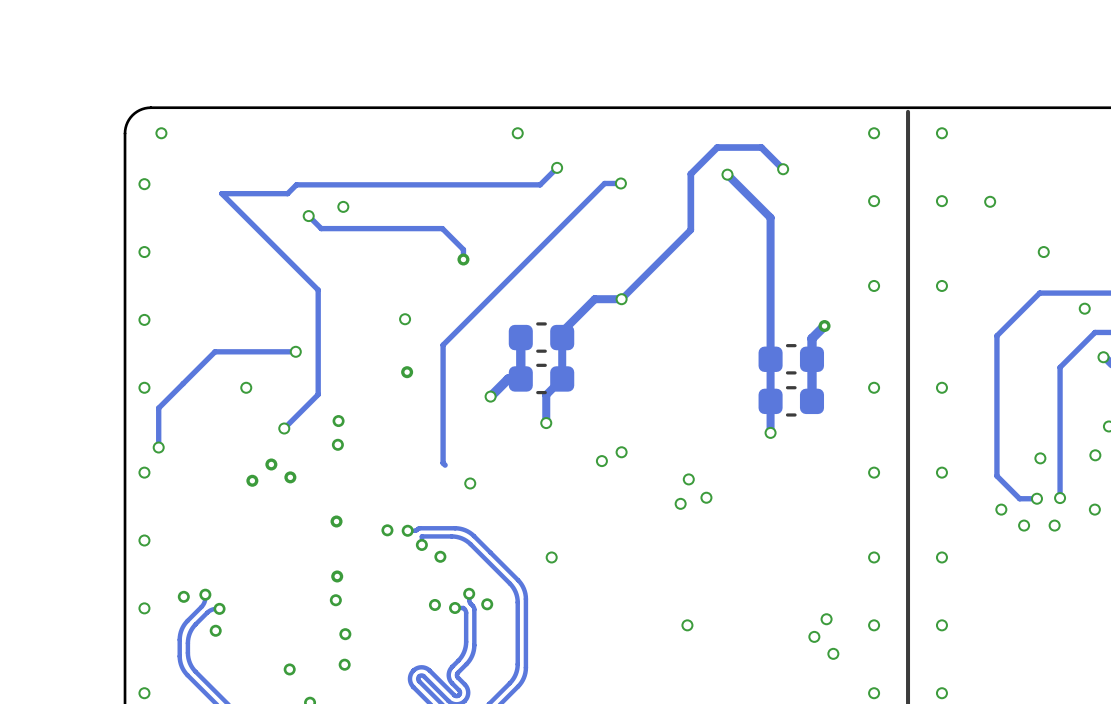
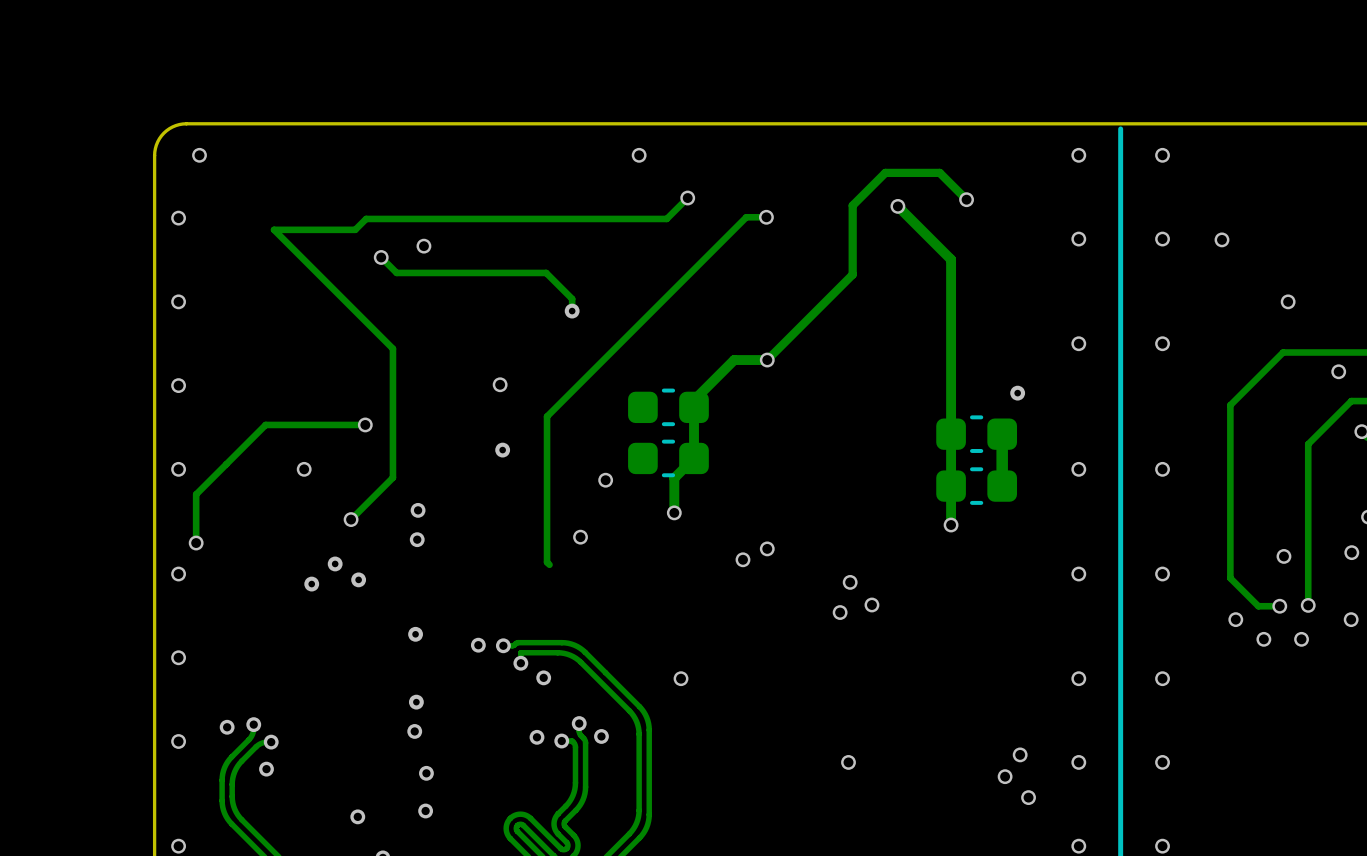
track: (824, 326) (811, 338) (811, 359) -> none
track: (520, 337) (520, 378) (508, 378) (490, 396) -> none
via position: (470, 483) -> (580, 537)

